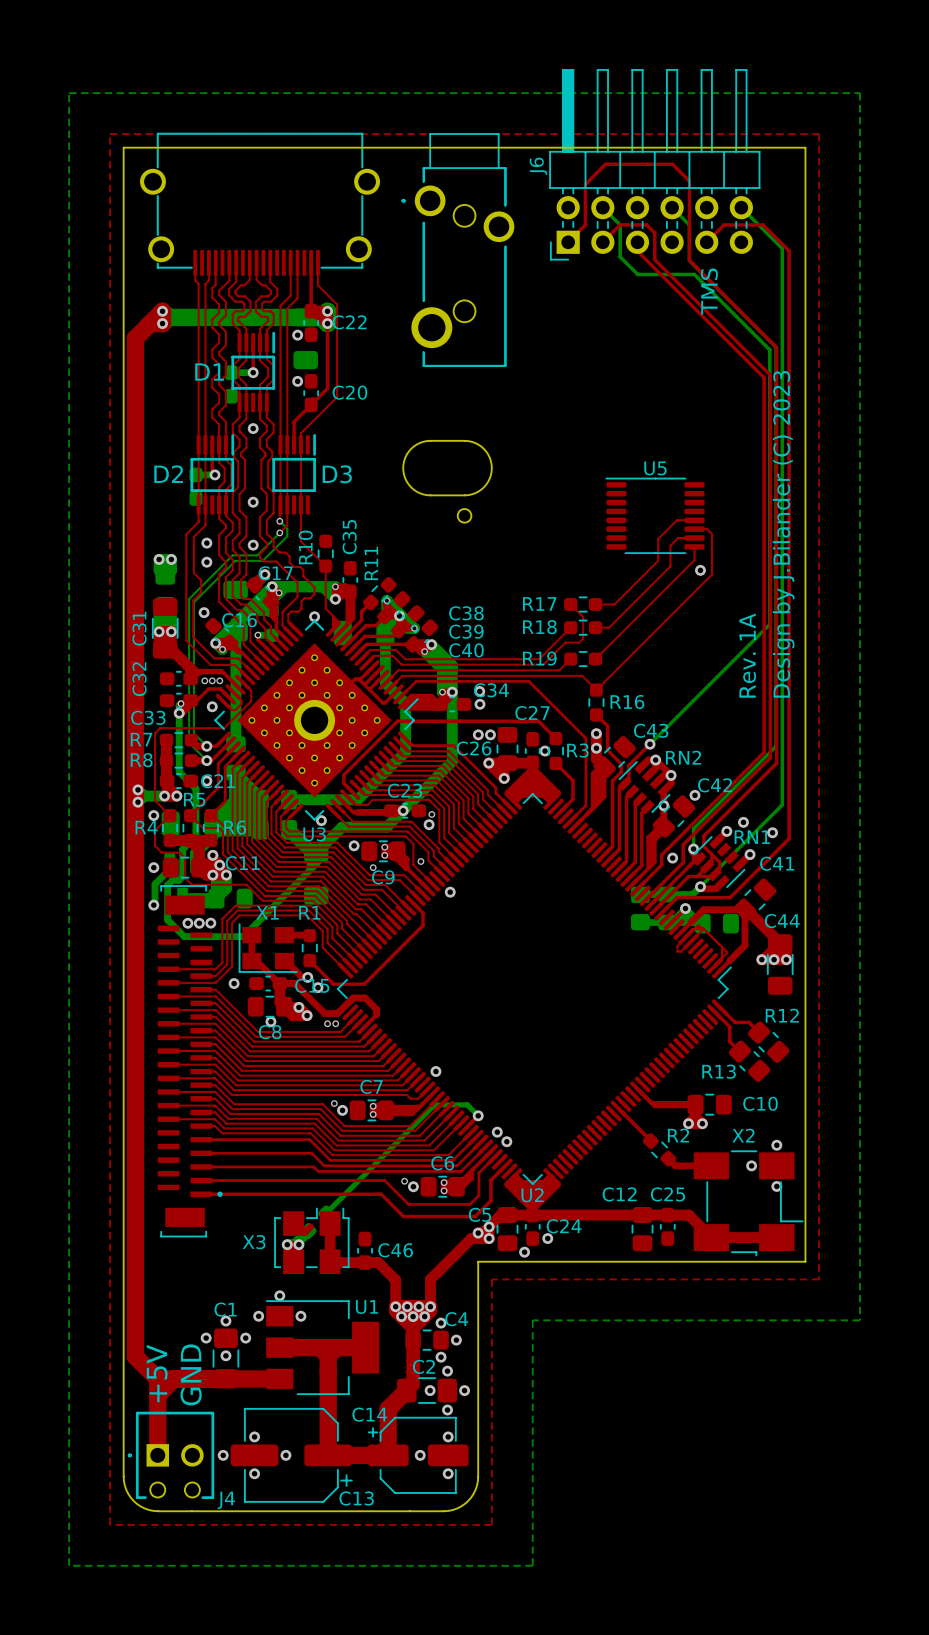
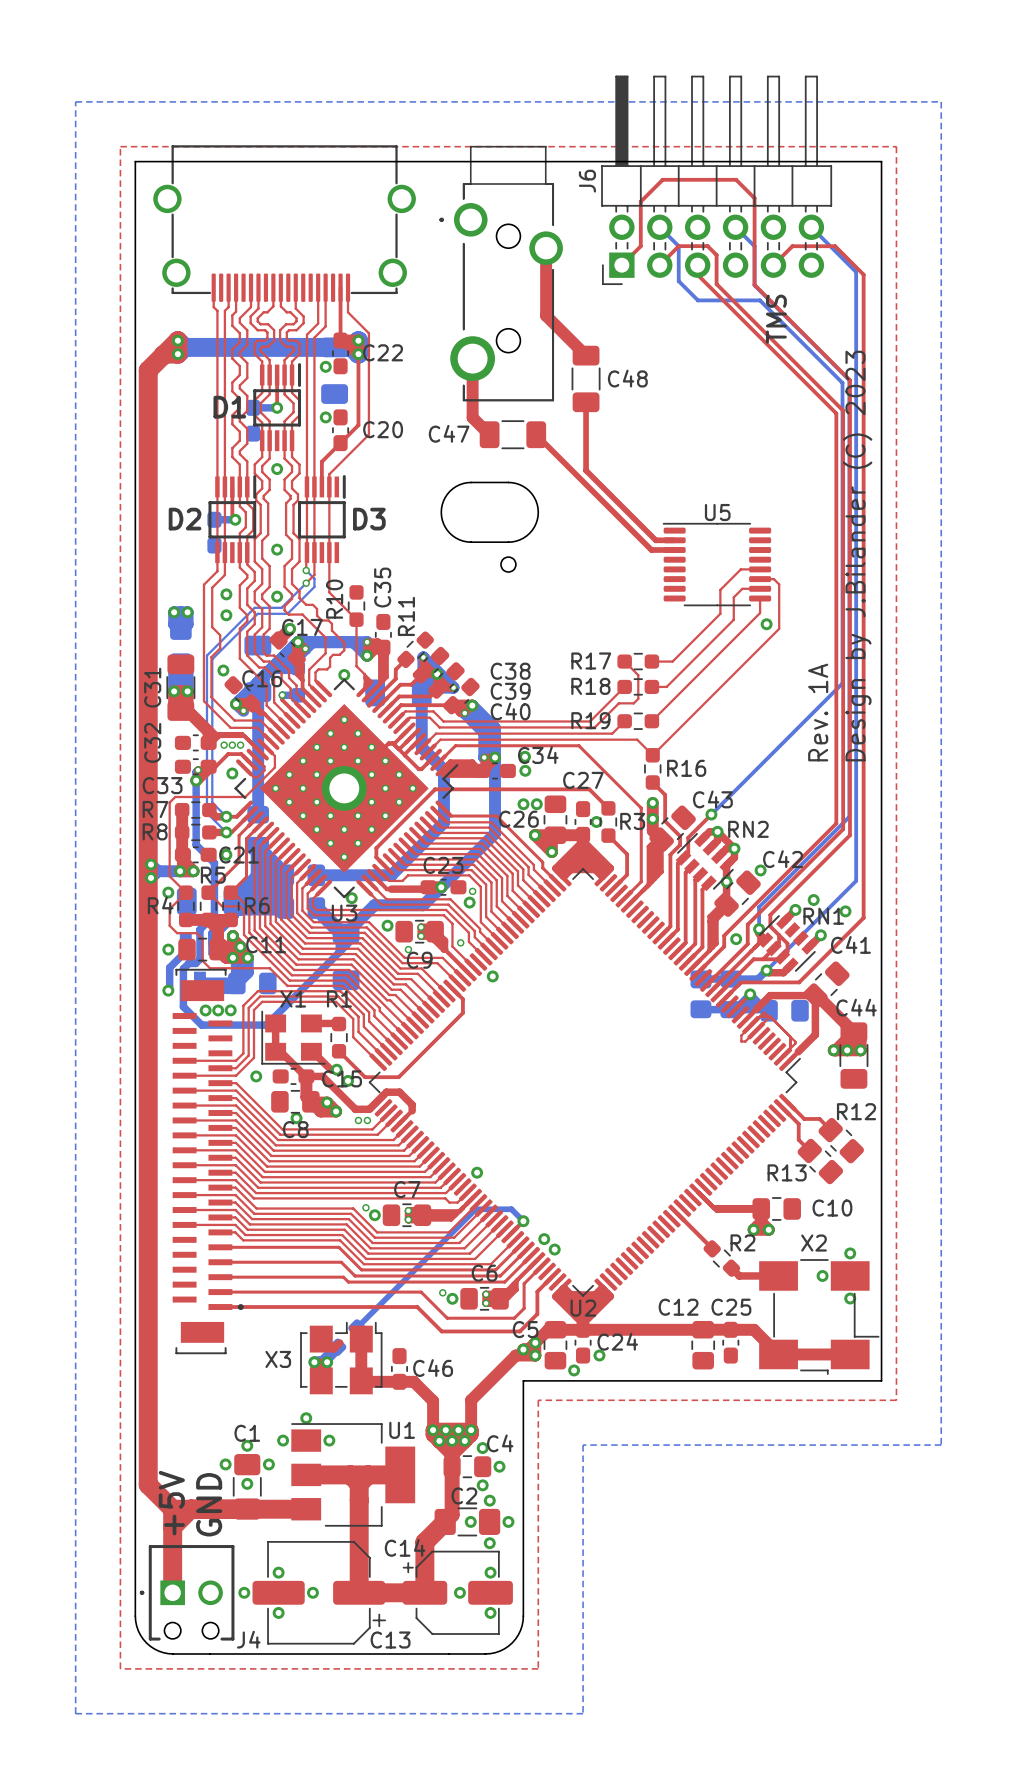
top track: none -> (546, 248) (546, 315) (586, 355)
top track: none -> (472, 358) (472, 417) (489, 434)
C48: none -> (586, 378)
top track: none -> (586, 402) (586, 470) (655, 540) (674, 540)
C47: none -> (512, 434)
top track: none -> (536, 434) (651, 550) (674, 550)

